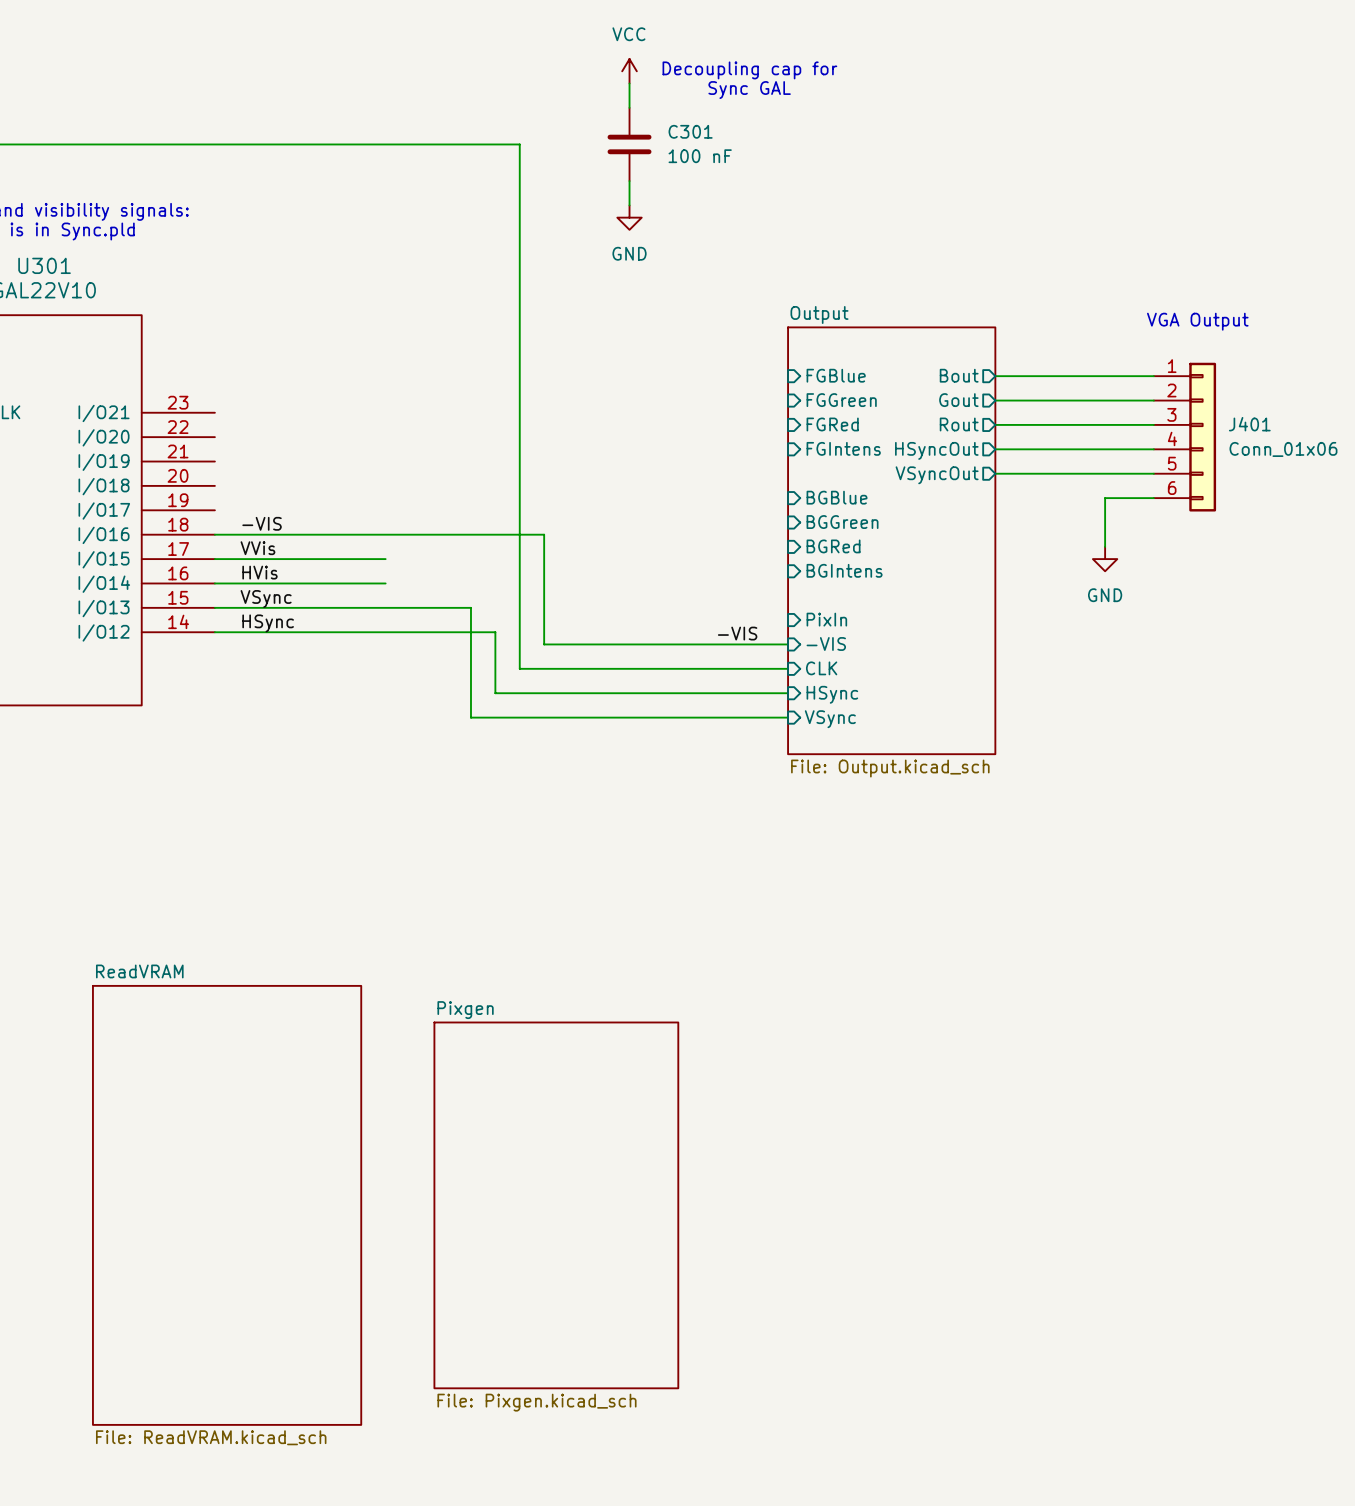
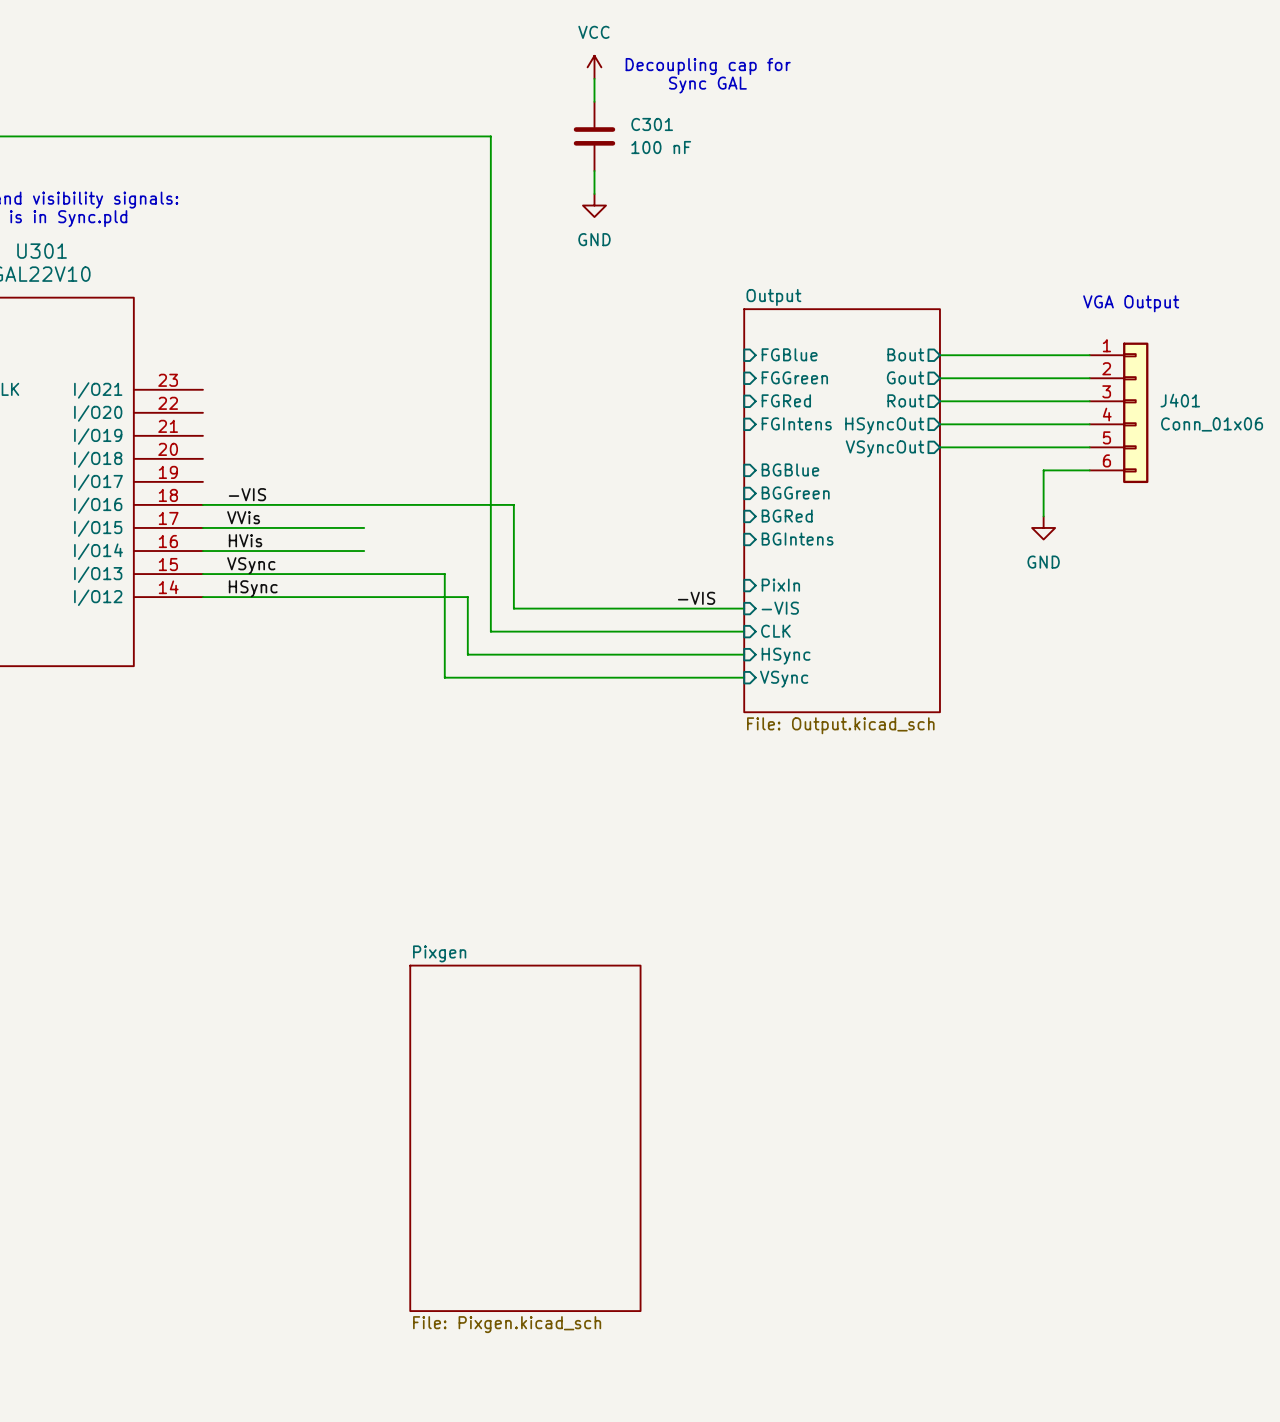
sheet ReadVRAM: File: ReadVRAM.kicad_sch (227, 1205) -> none

